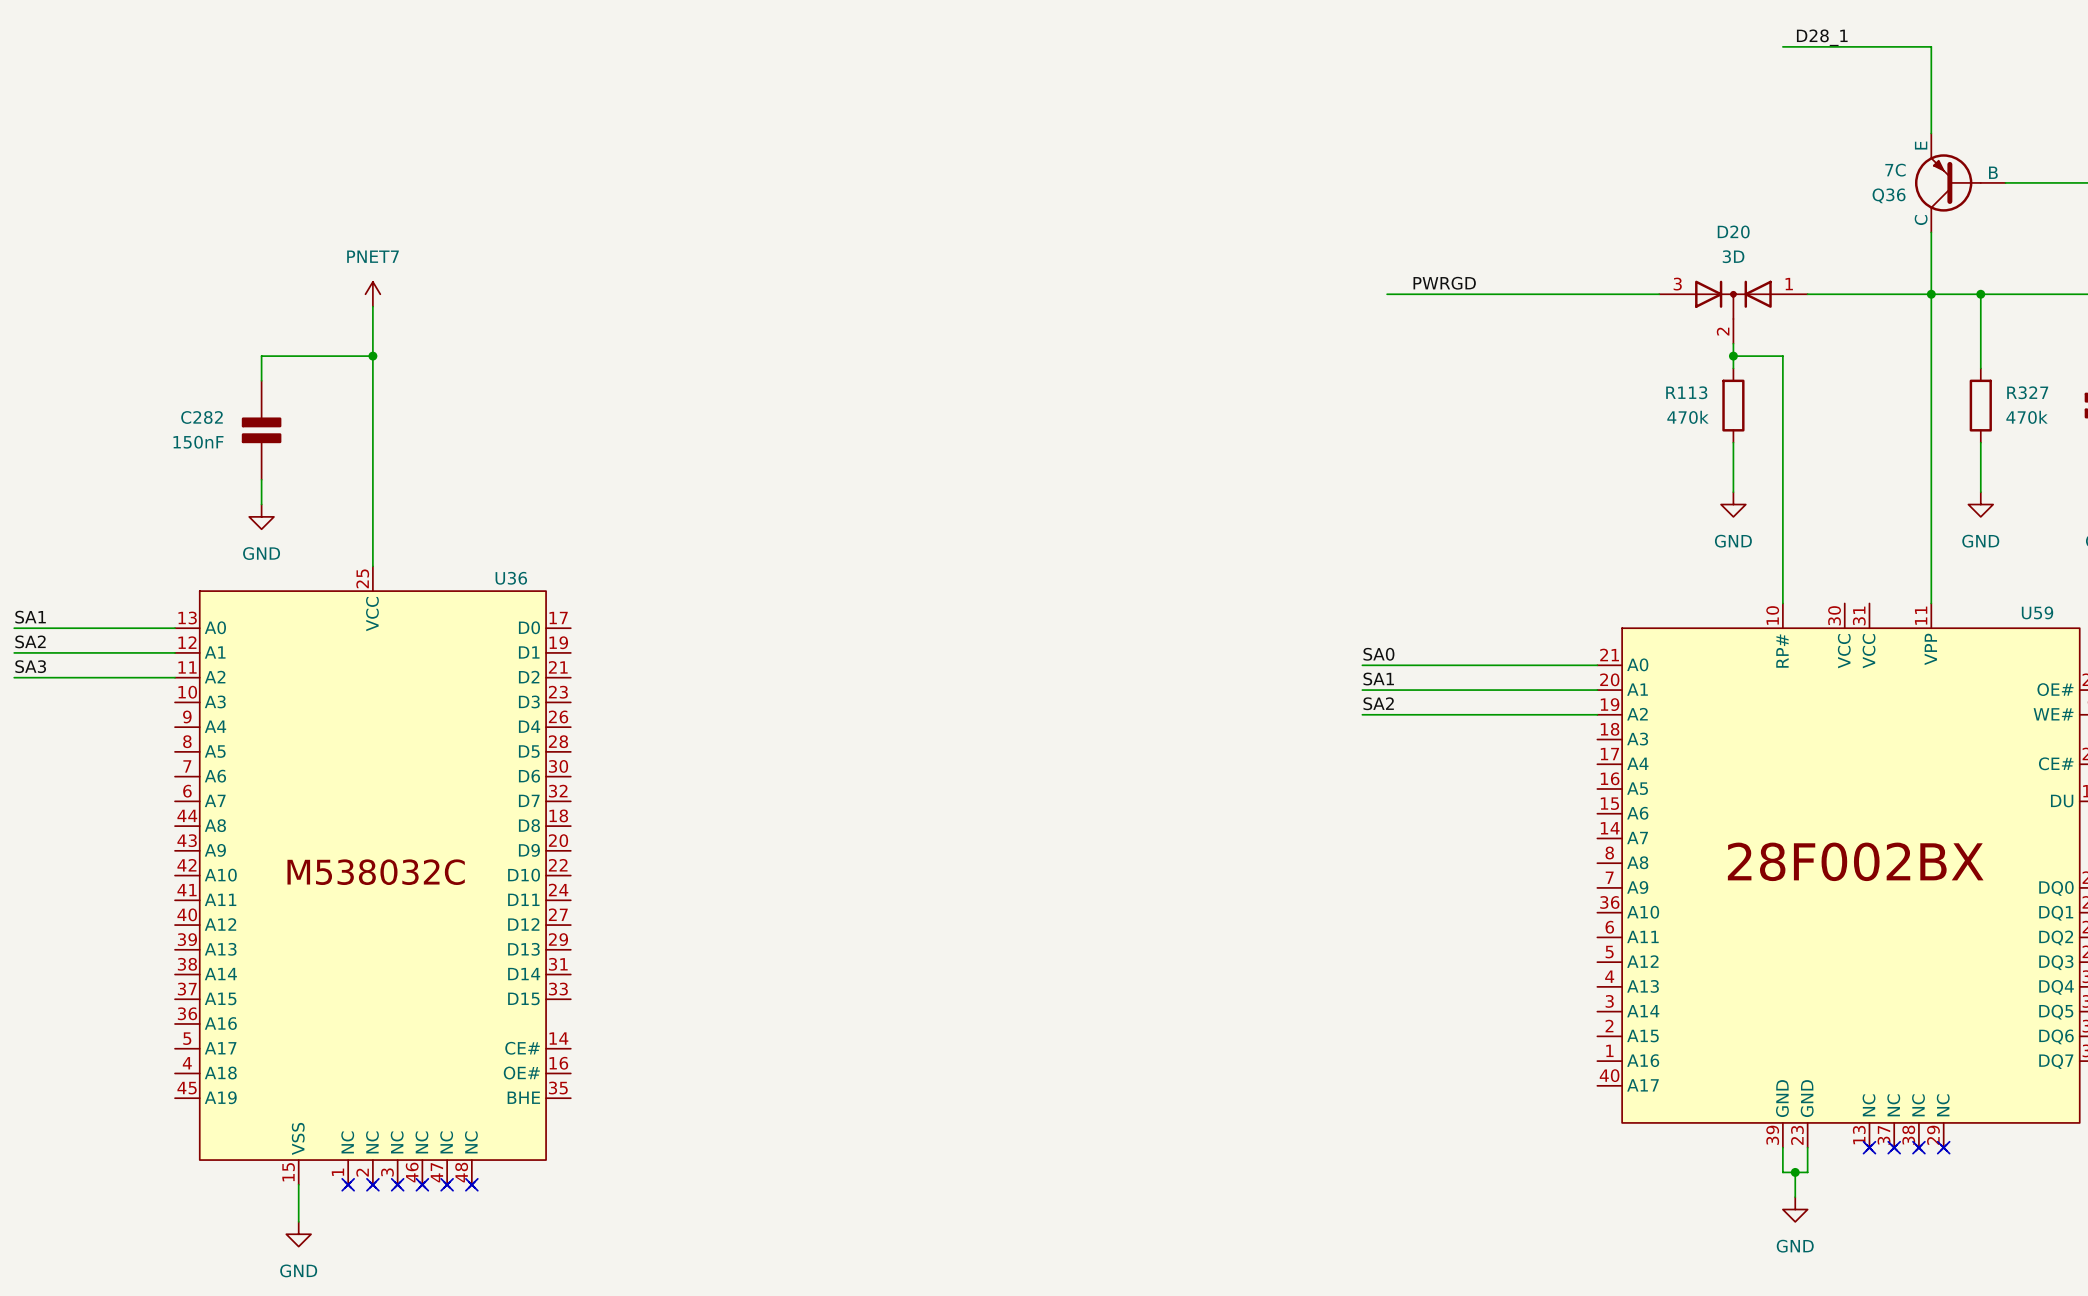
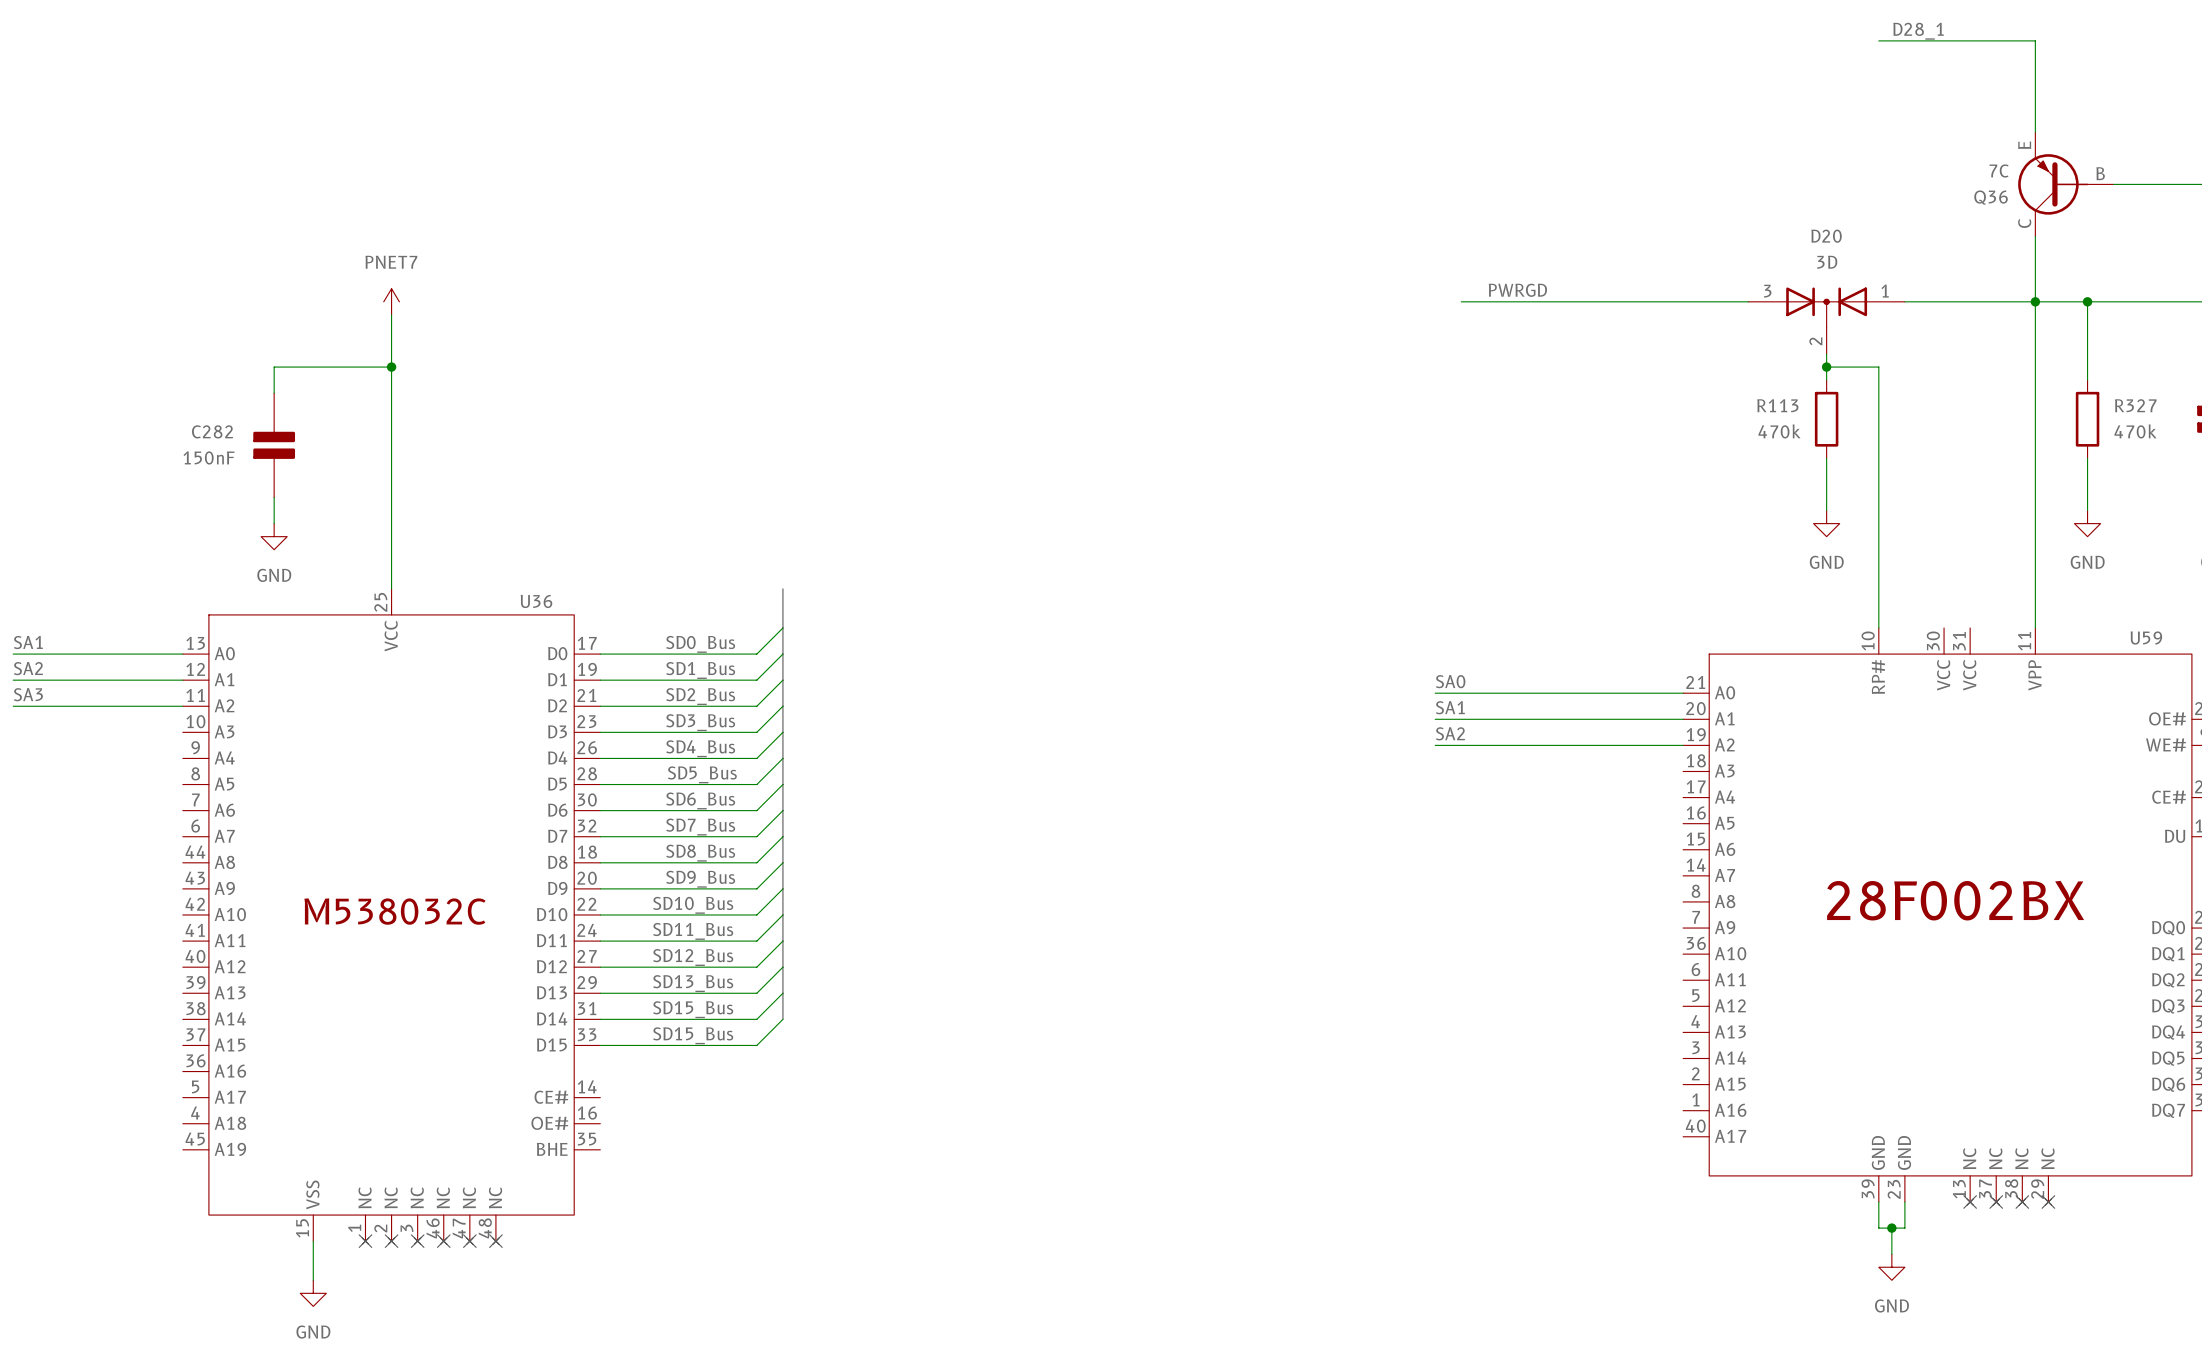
bus: none -> (782, 588) (782, 1019)
wire: none -> (782, 627) (756, 654) (600, 654)
label: none -> SD0_Bus (700, 644)
wire: none -> (782, 654) (756, 680) (600, 680)
label: none -> SD1_Bus (700, 670)
wire: none -> (782, 680) (756, 706) (600, 706)
label: none -> SD2_Bus (700, 696)
wire: none -> (782, 706) (756, 732) (600, 732)
label: none -> SD3_Bus (700, 722)
wire: none -> (782, 732) (756, 758) (600, 758)
label: none -> SD4_Bus (700, 748)
wire: none -> (782, 758) (756, 784) (600, 784)
label: none -> SD5_Bus (702, 774)
wire: none -> (782, 784) (756, 810) (600, 810)
label: none -> SD6_Bus (700, 800)
wire: none -> (782, 810) (756, 836) (600, 836)
label: none -> SD7_Bus (700, 827)
wire: none -> (782, 836) (756, 862) (600, 862)
label: none -> SD8_Bus (700, 853)
wire: none -> (782, 862) (756, 888) (600, 888)
label: none -> SD9_Bus (700, 879)
wire: none -> (782, 888) (756, 914) (600, 914)
label: none -> SD10_Bus (693, 905)
wire: none -> (782, 914) (756, 941) (600, 941)
label: none -> SD11_Bus (693, 931)
wire: none -> (782, 941) (756, 967) (600, 967)
label: none -> SD12_Bus (693, 957)
wire: none -> (782, 967) (756, 993) (600, 993)
label: none -> SD13_Bus (693, 983)
wire: none -> (782, 993) (756, 1019) (600, 1019)
label: none -> SD15_Bus (693, 1009)
wire: none -> (782, 1019) (756, 1045) (600, 1045)
label: none -> SD15_Bus (693, 1035)

